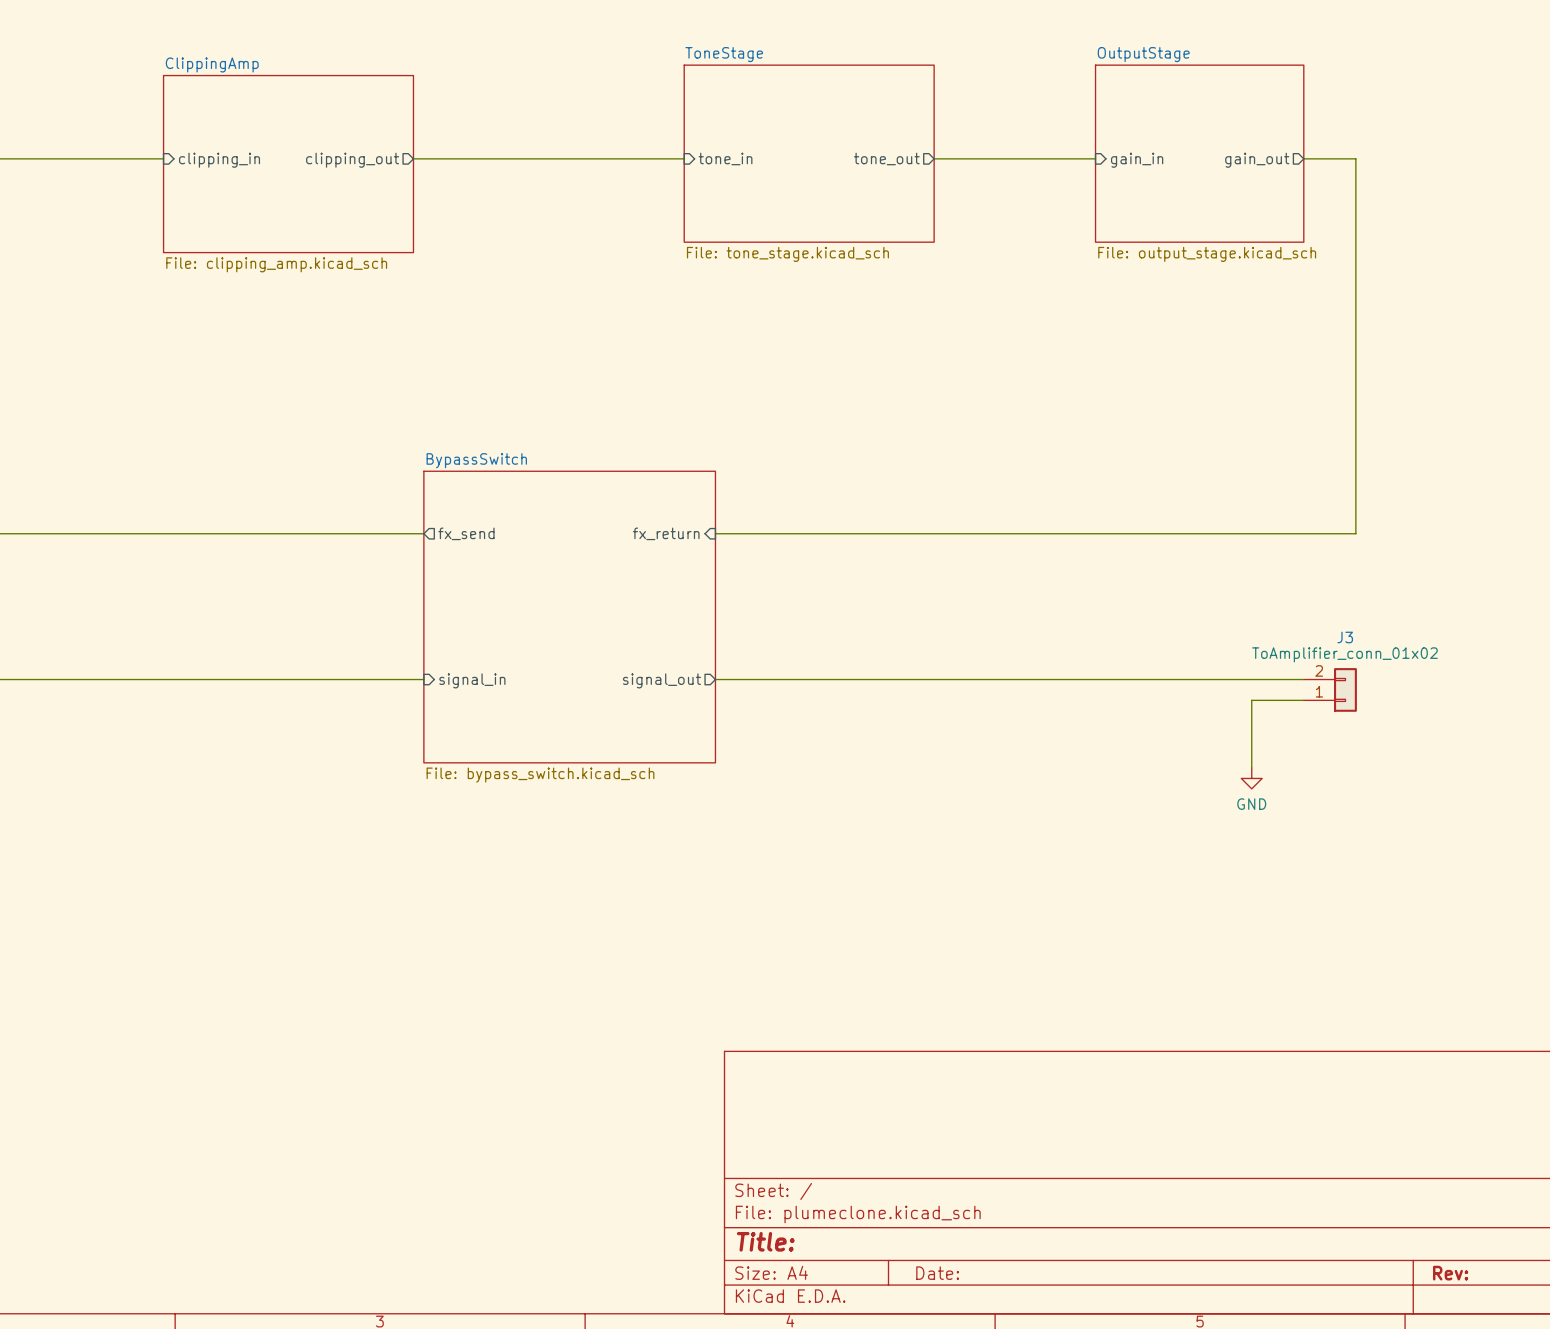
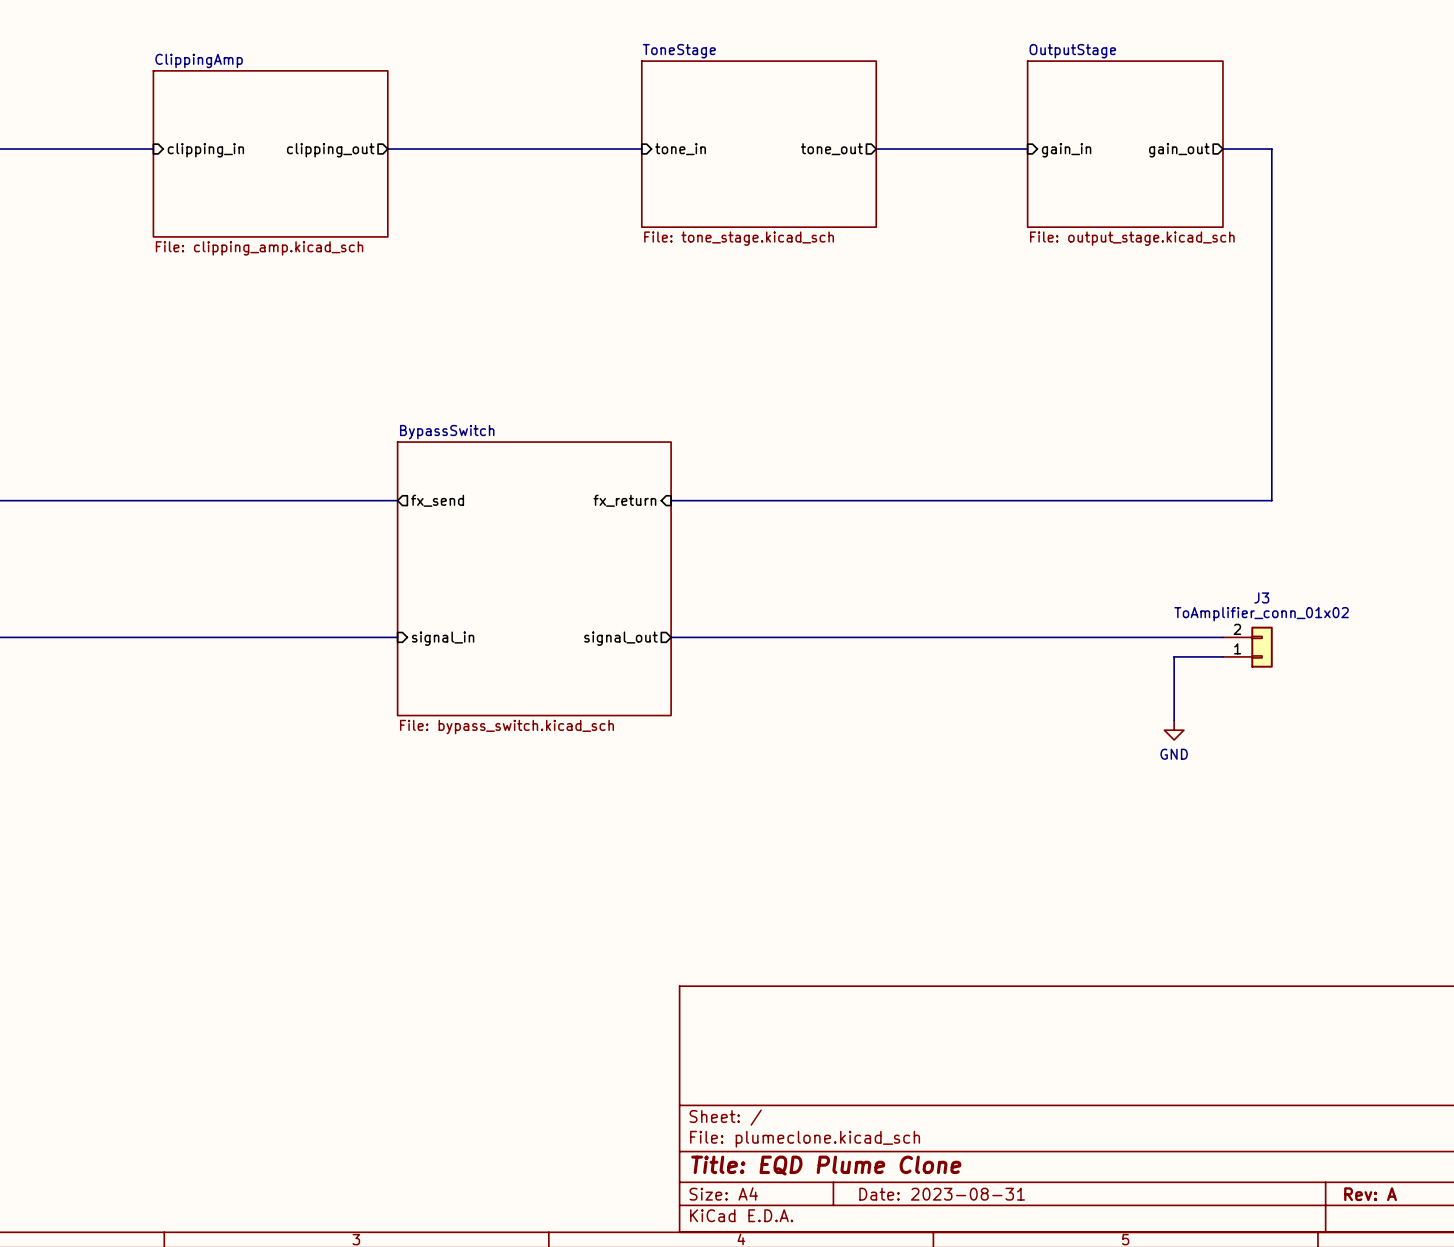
title block: Title: (765, 1241) -> Title: EQD Plume Clone (826, 1165)
title block: Date: (937, 1273) -> Date: 2023-08-31 (942, 1194)
title block: Rev: (1450, 1273) -> Rev: A (1370, 1194)

